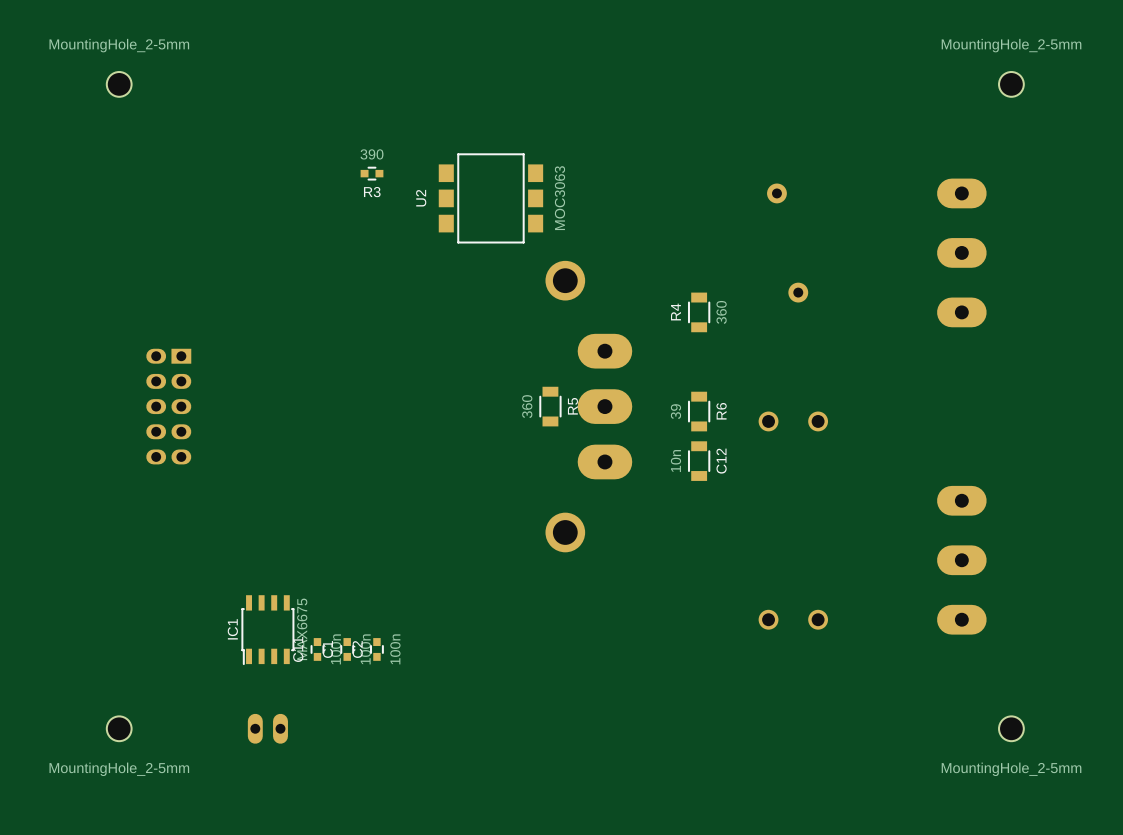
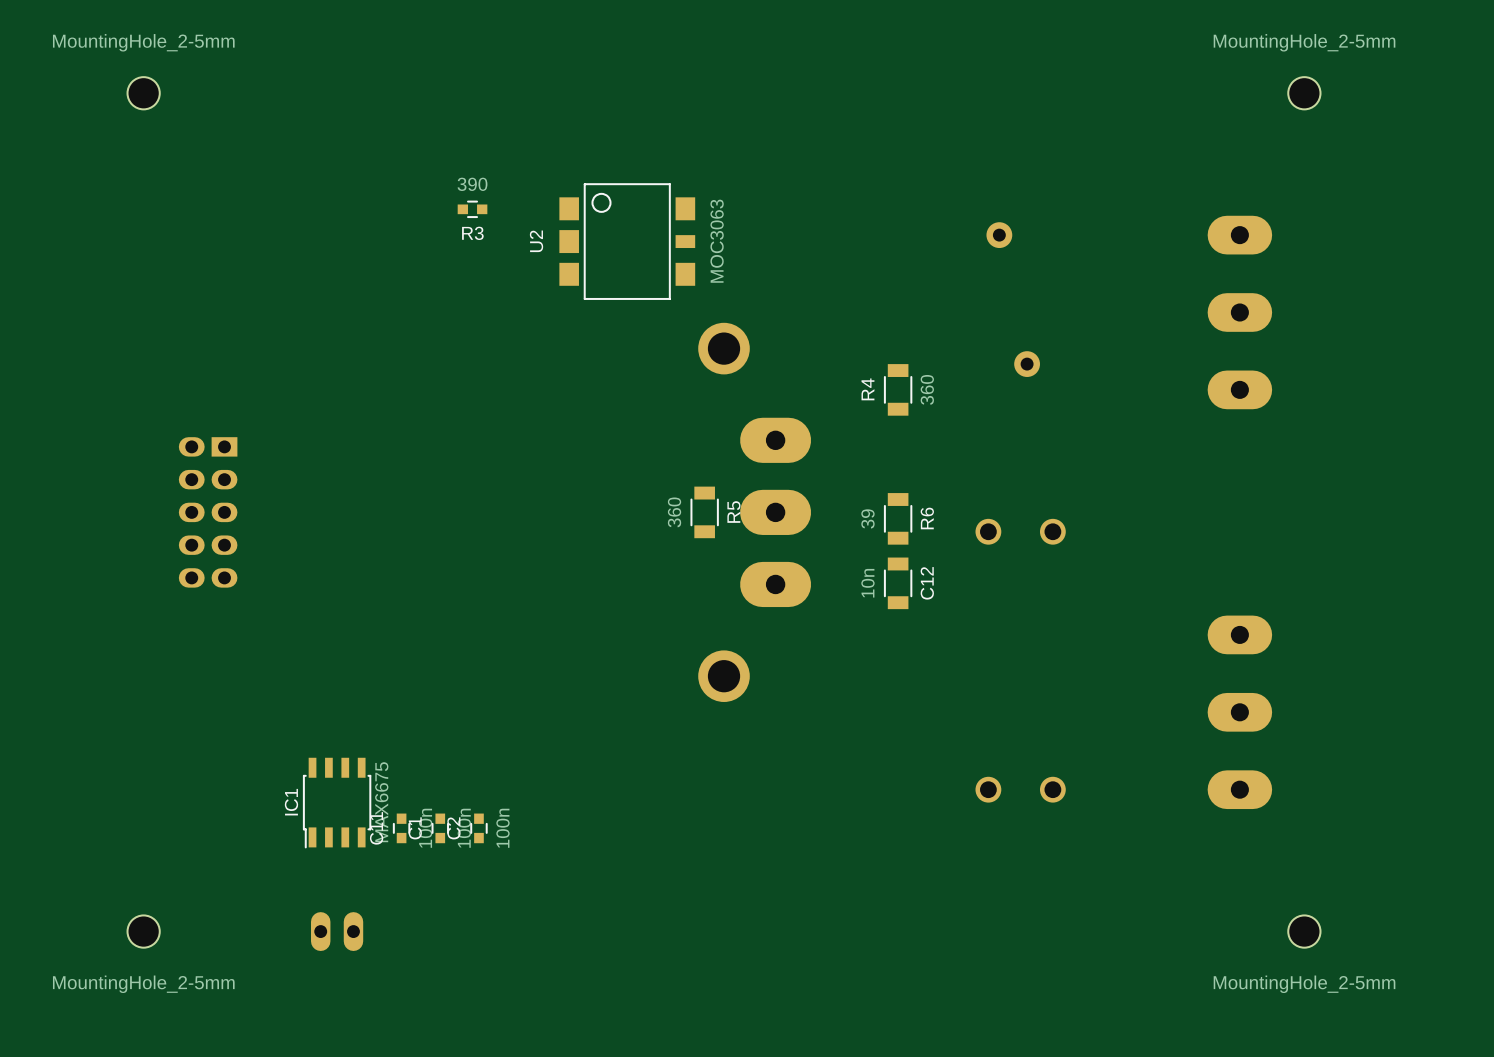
U2 footprint: [438, 153, 544, 244] -> [559, 183, 696, 300]

